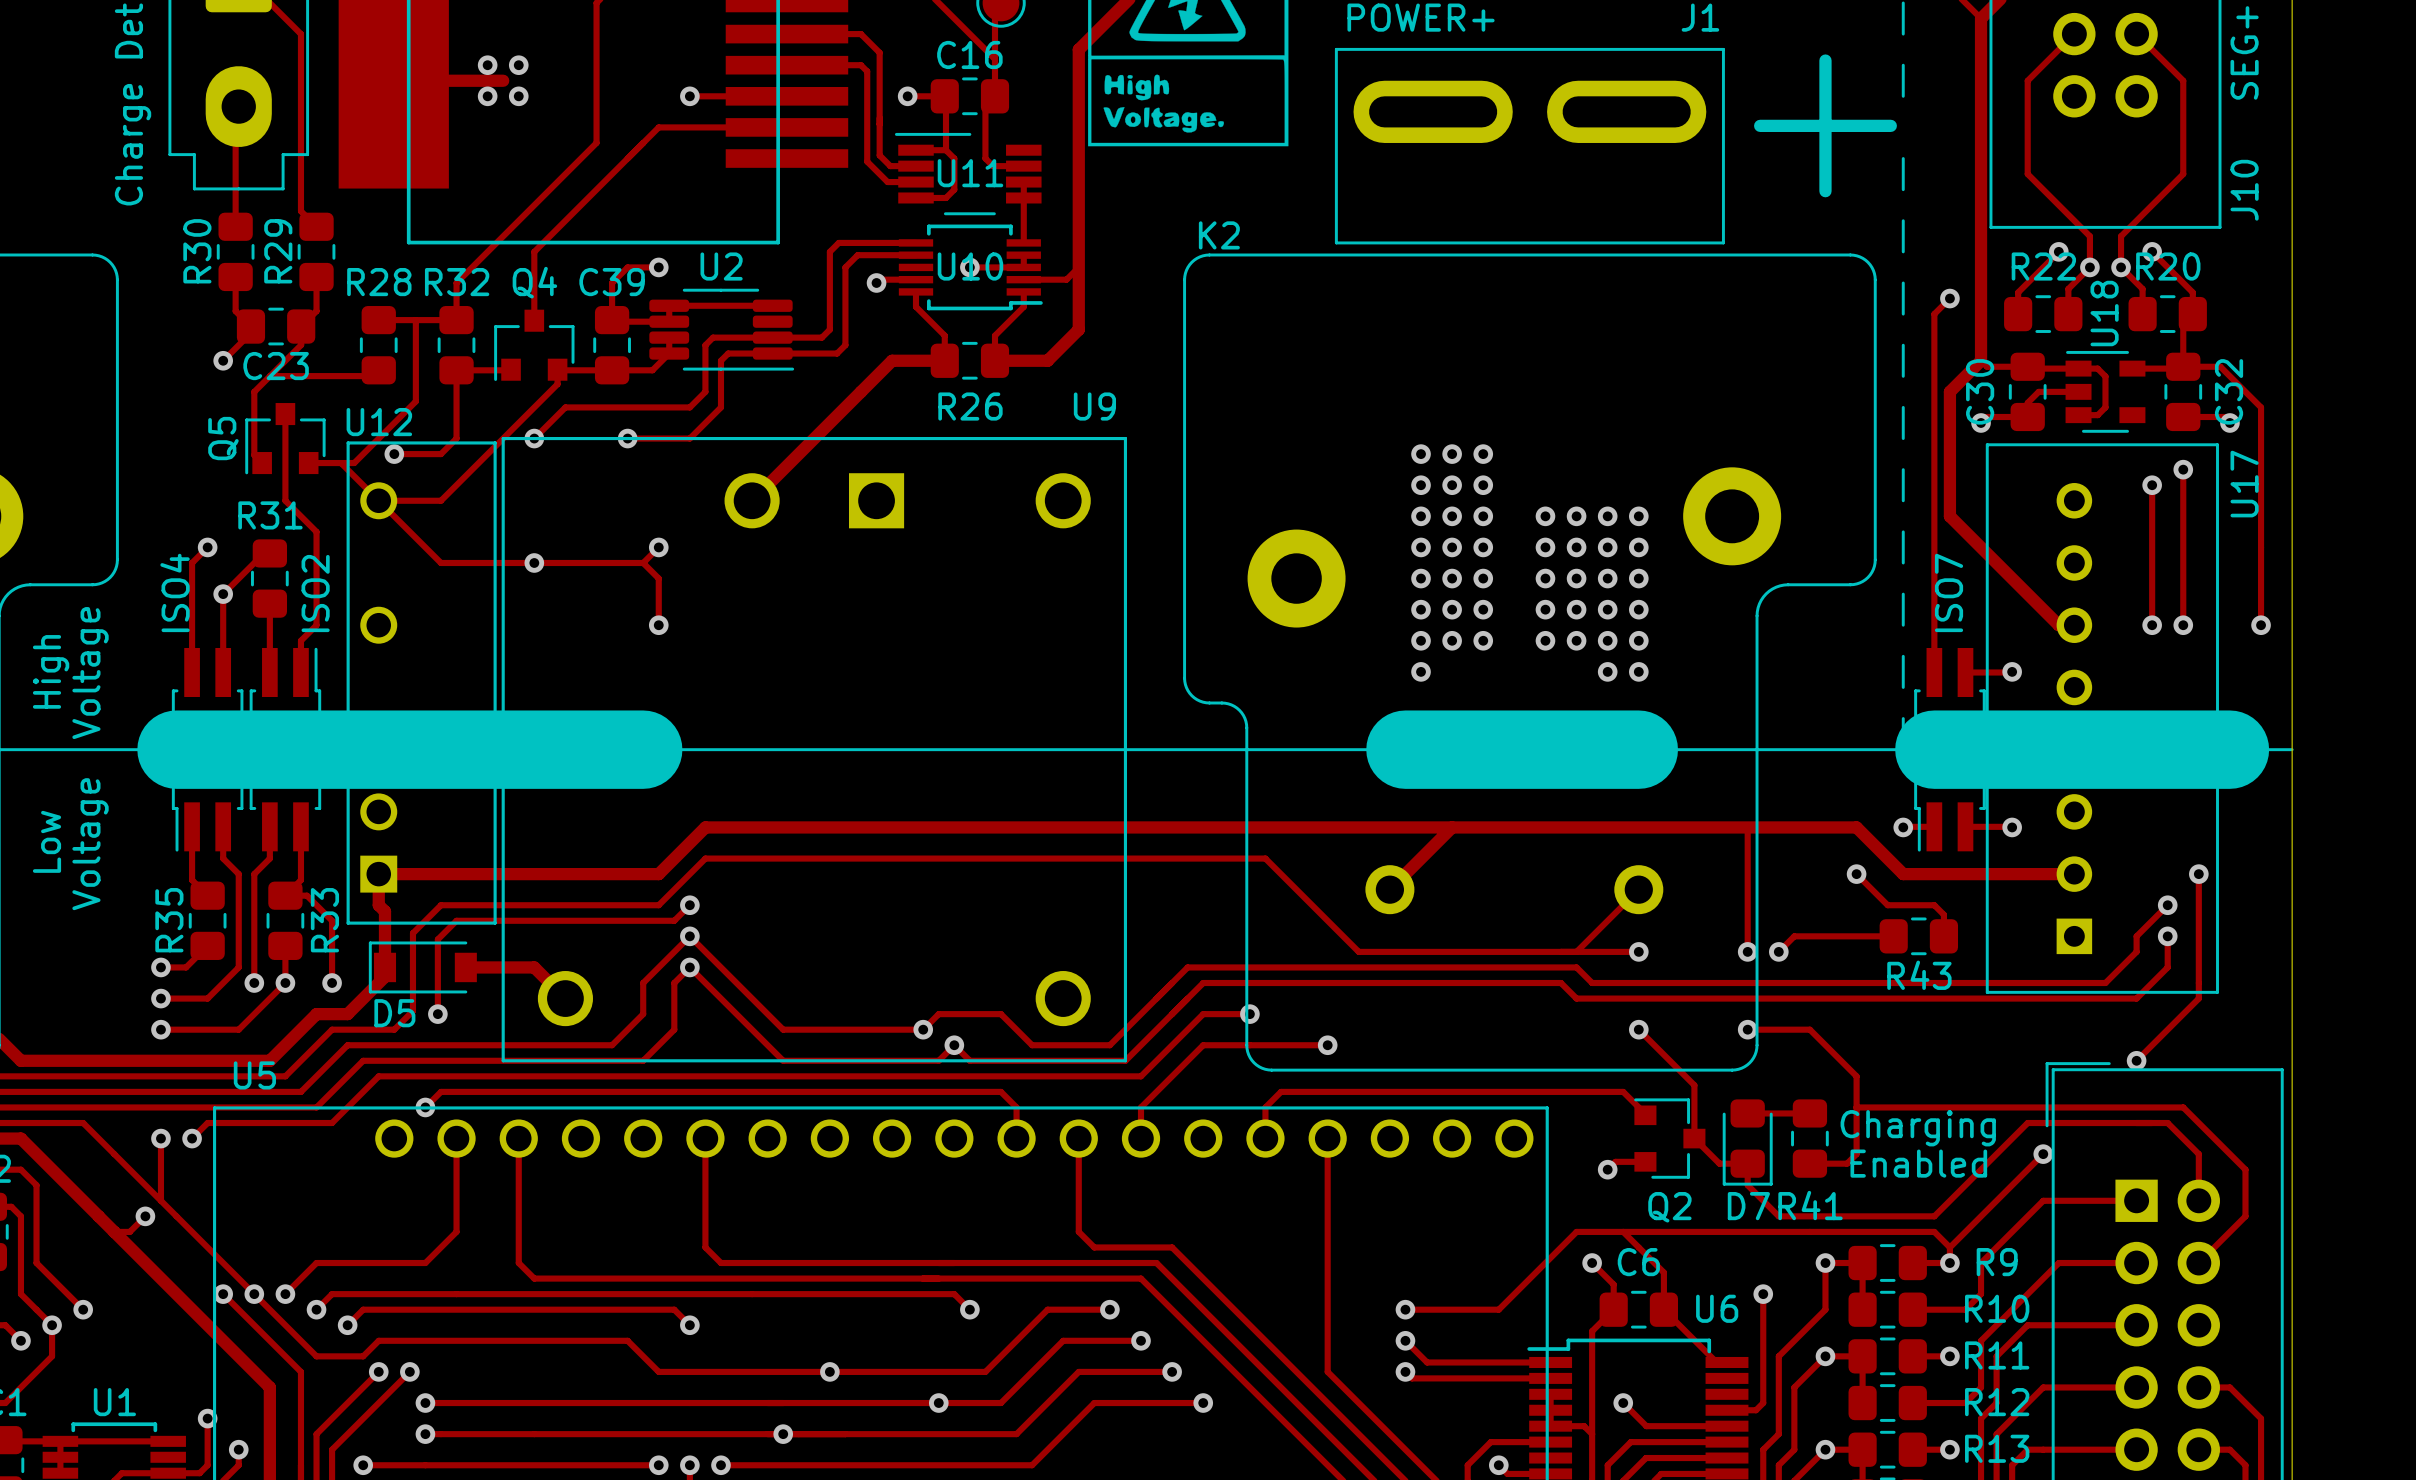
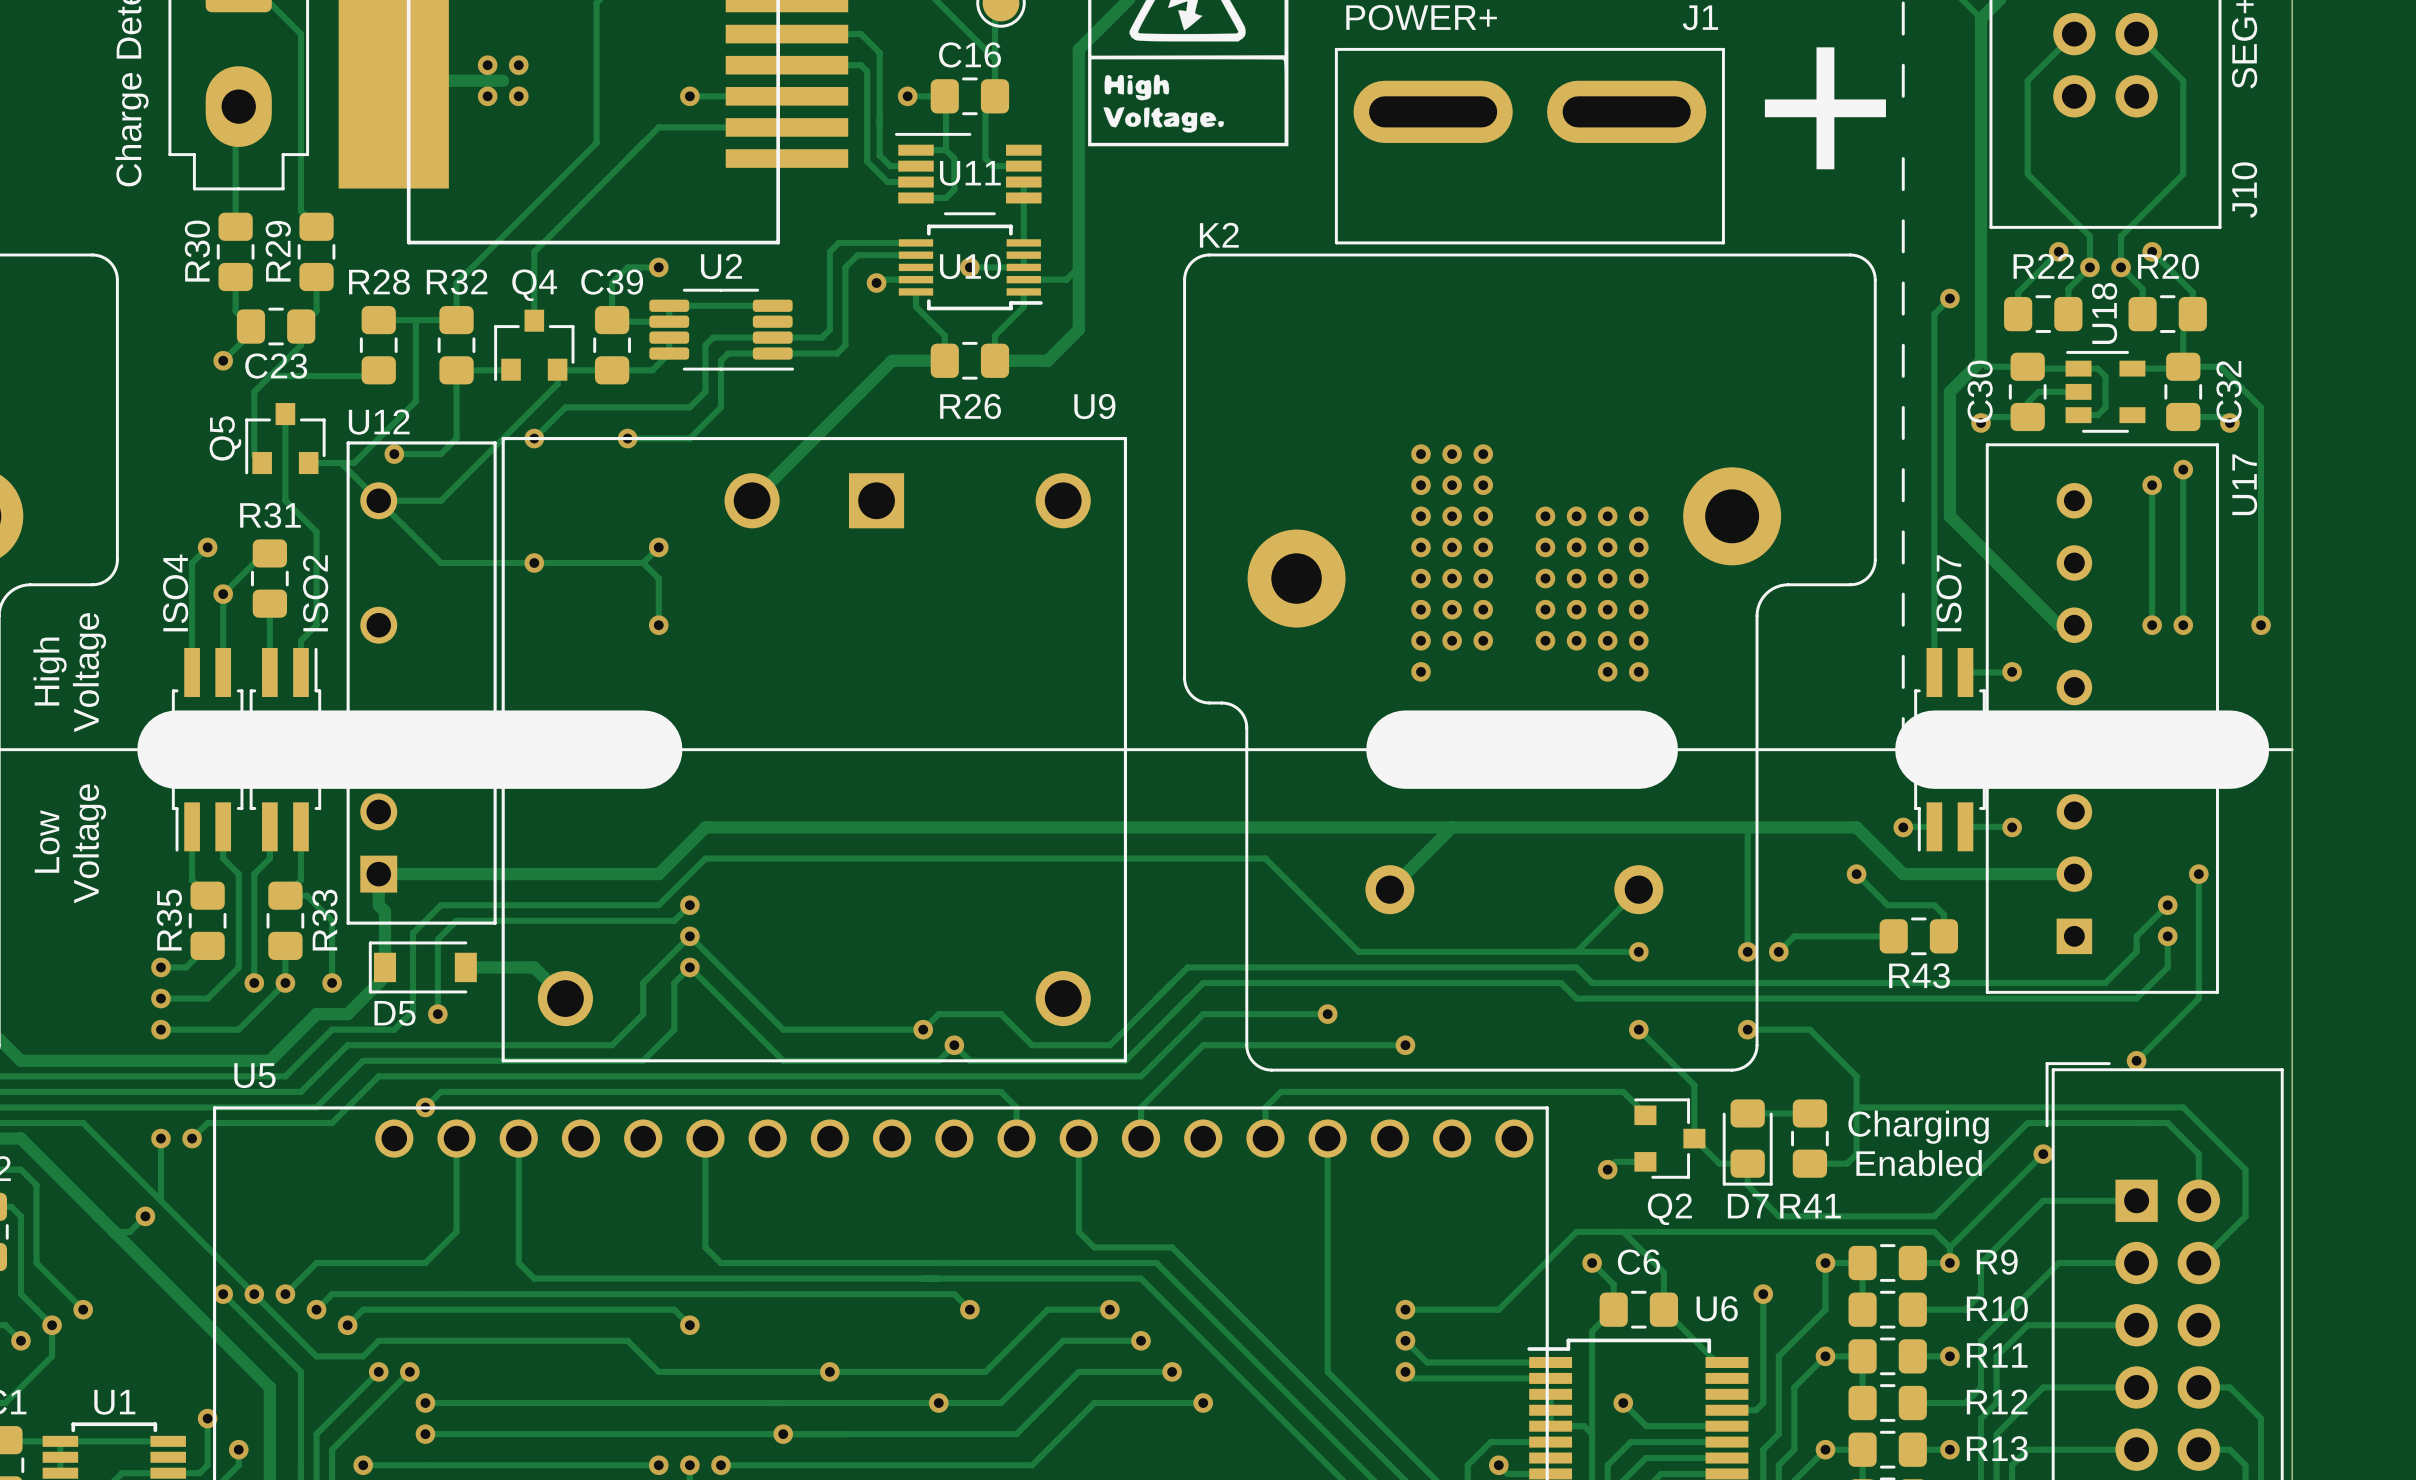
track: none -> (1249, 1014) (1327, 1014)
via: (1249, 1014) -> none
track: none -> (1327, 1045) (1405, 1045)
via position: (1327, 1045) -> (1327, 1014)
via: none -> (1405, 1045)

